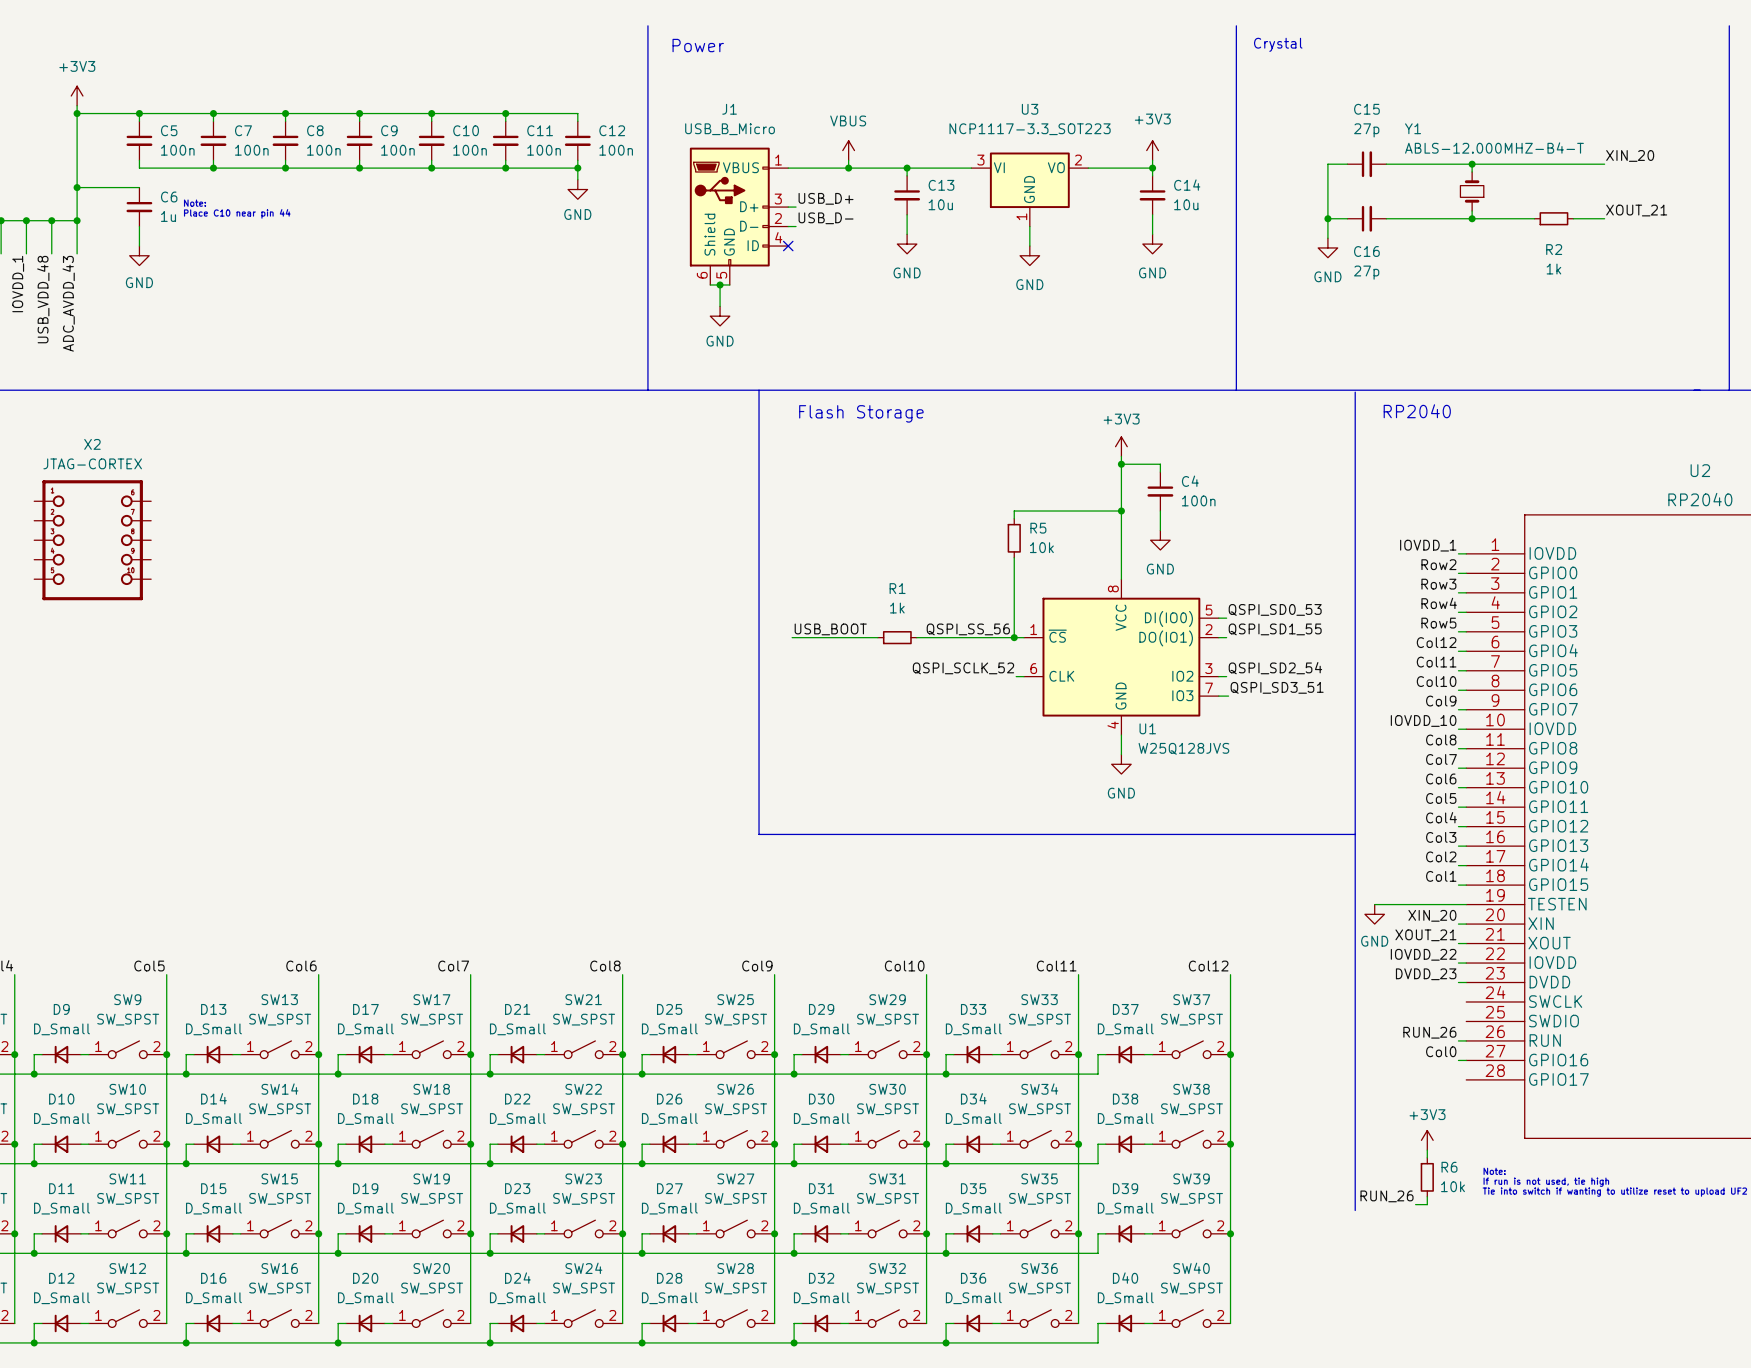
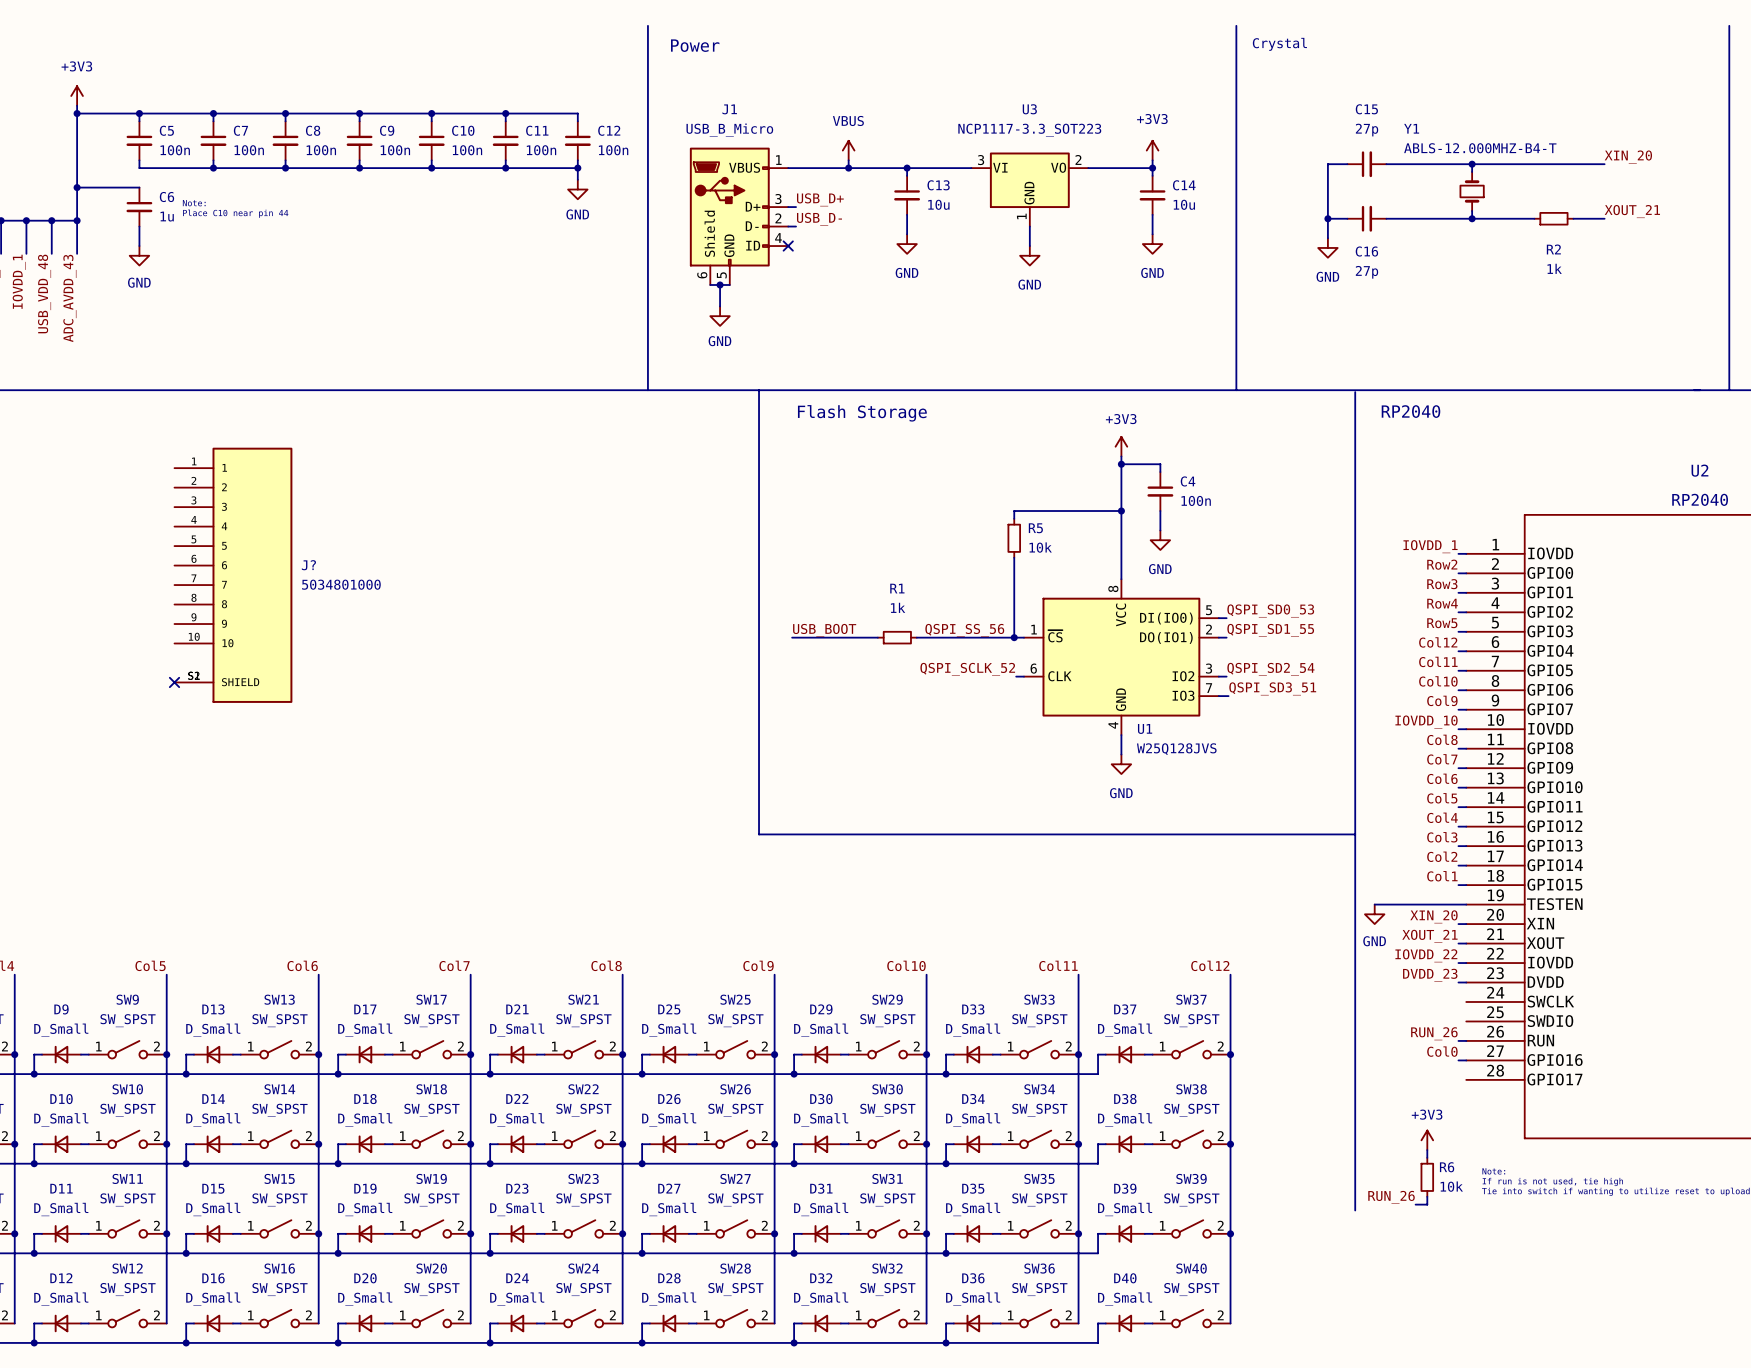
X2: JTAG-CORTEX (92, 540) -> none
J?: none -> 5034801000 (233, 575)
no-connect mark: none -> (174, 682)

